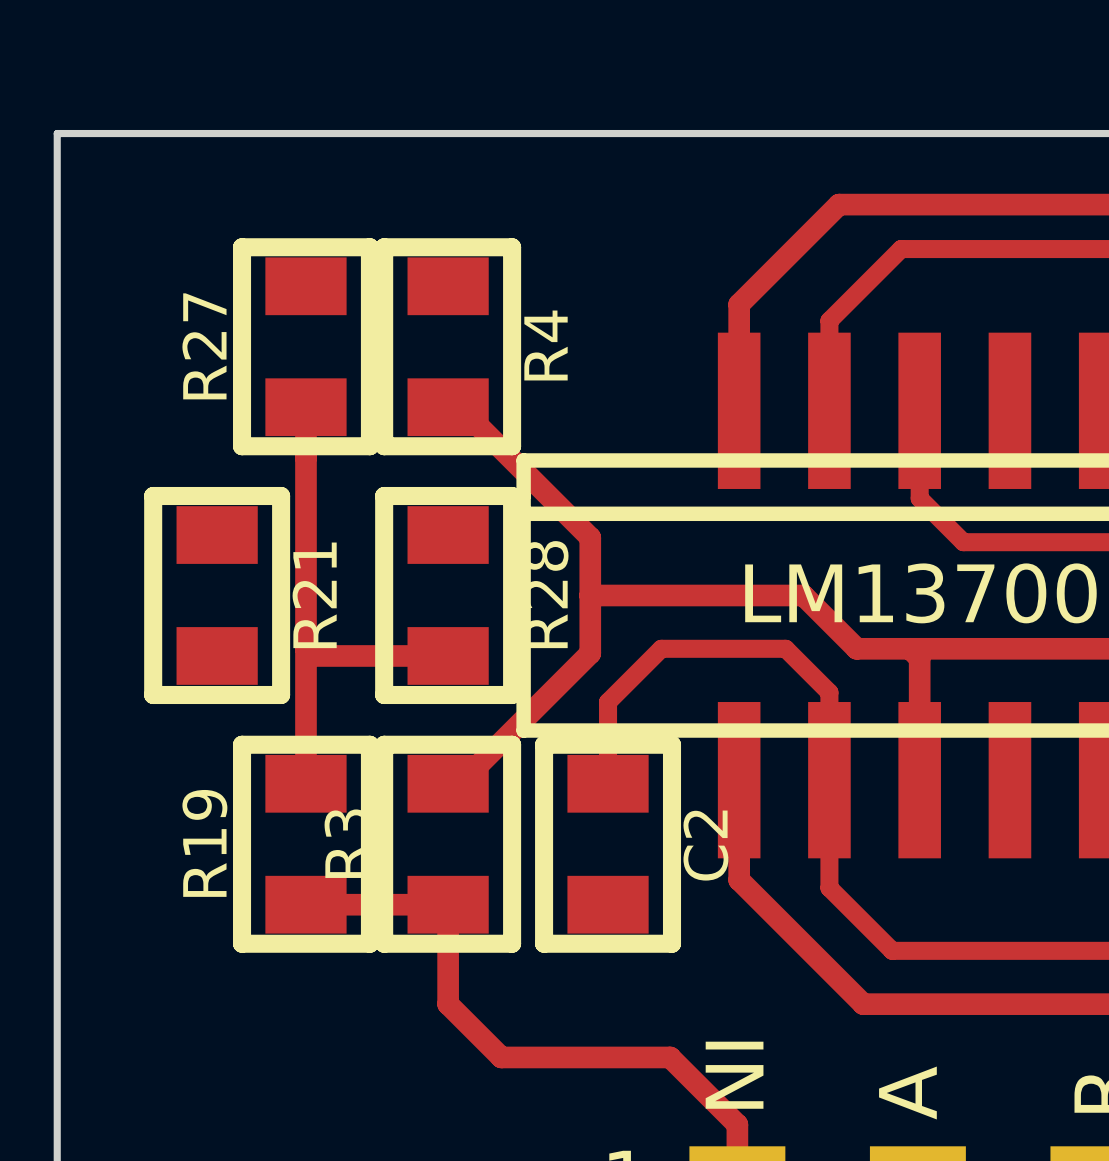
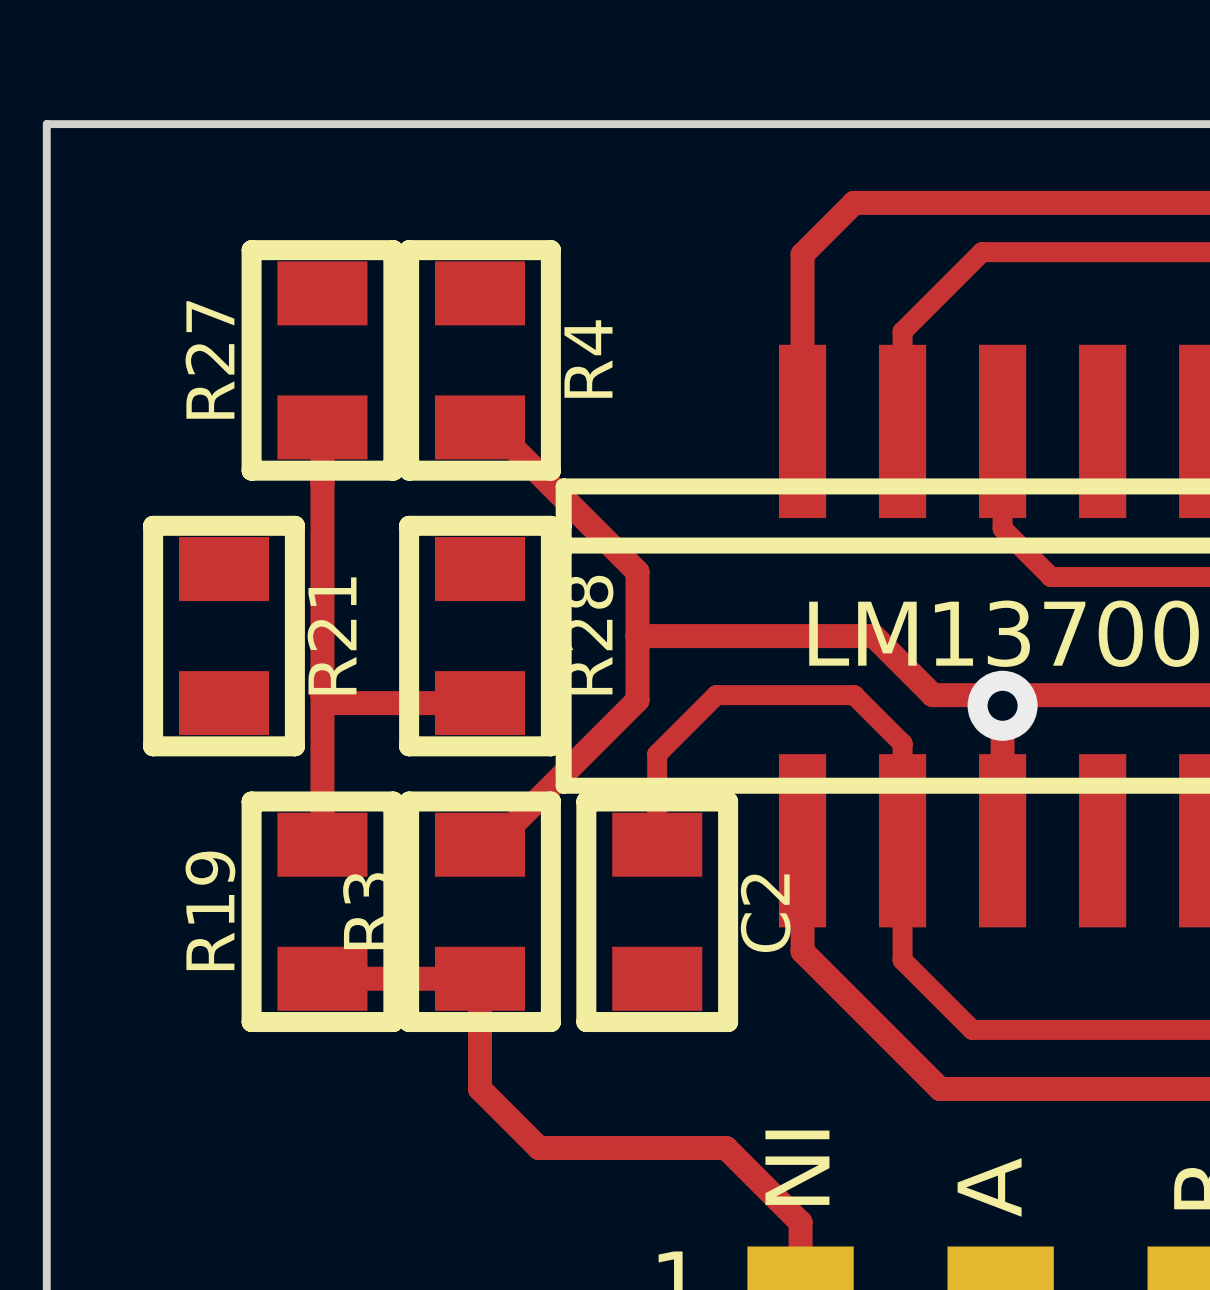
track: (839, 204) (739, 304) -> (913, 202) (854, 202) (802, 254) (802, 313)
via: none -> (1002, 705)

